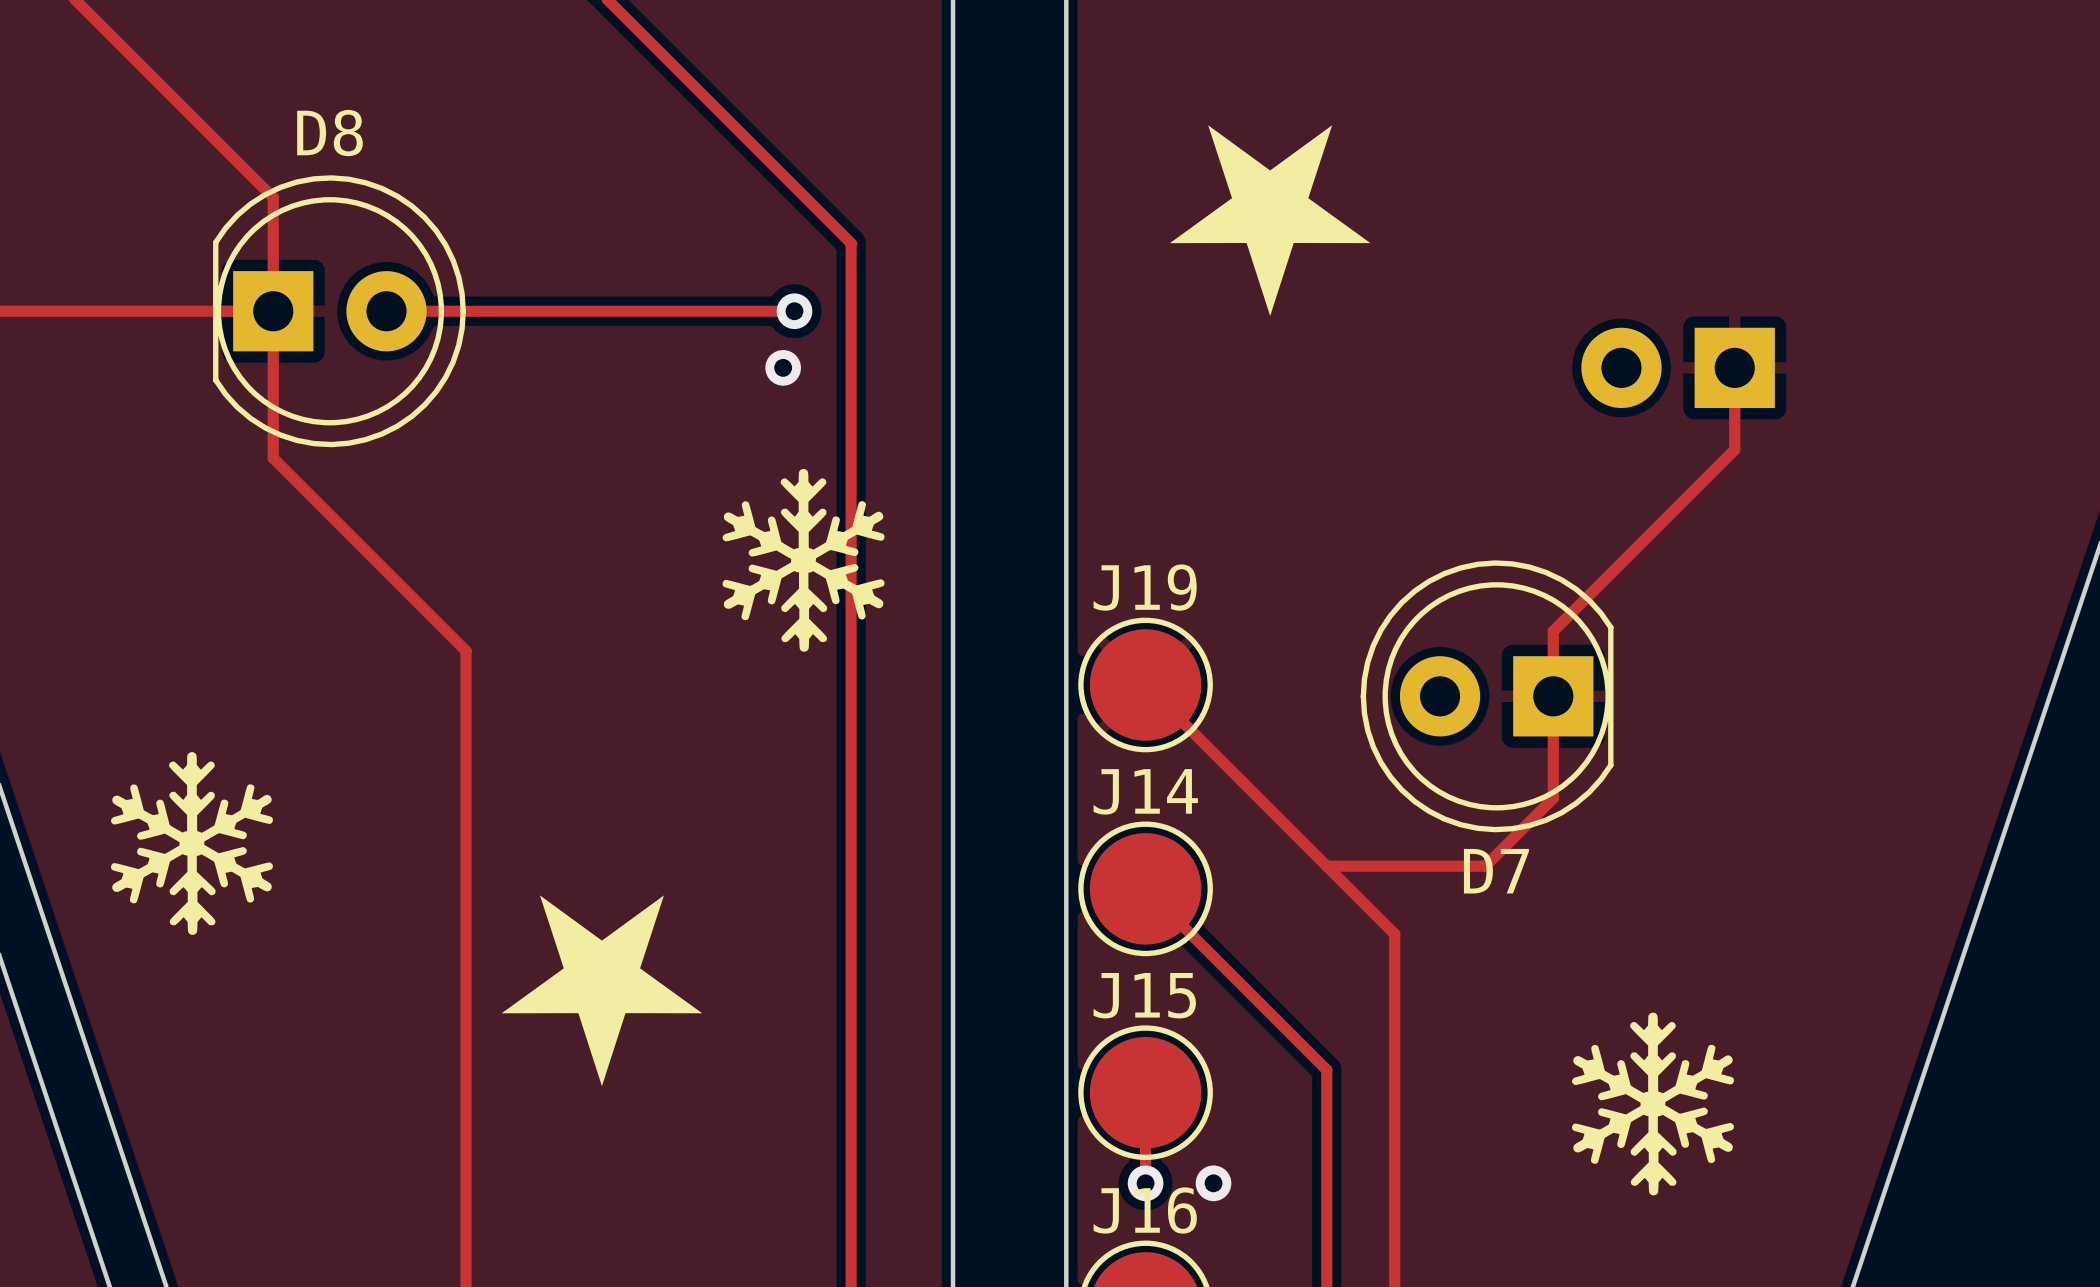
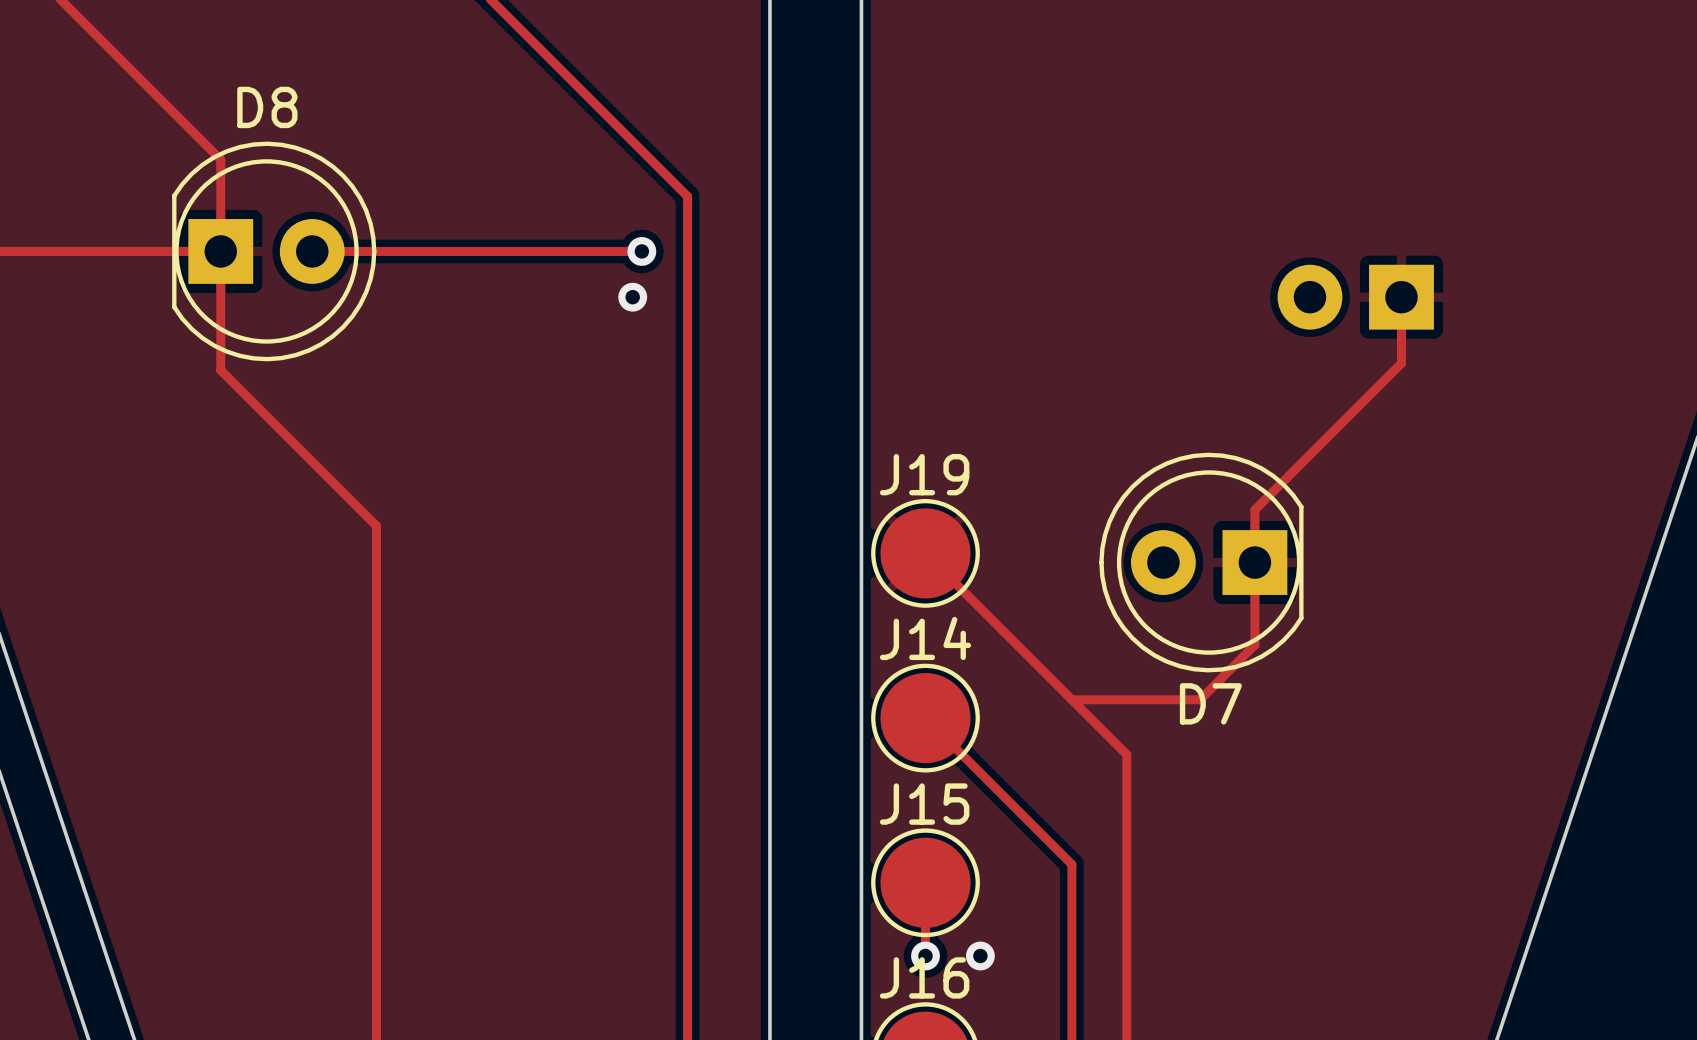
drawing: [1169, 125, 1371, 316] -> none
drawing: [722, 468, 885, 652] -> none
drawing: [110, 752, 273, 935] -> none
drawing: [501, 895, 703, 1087] -> none
drawing: [1571, 1012, 1734, 1196] -> none

